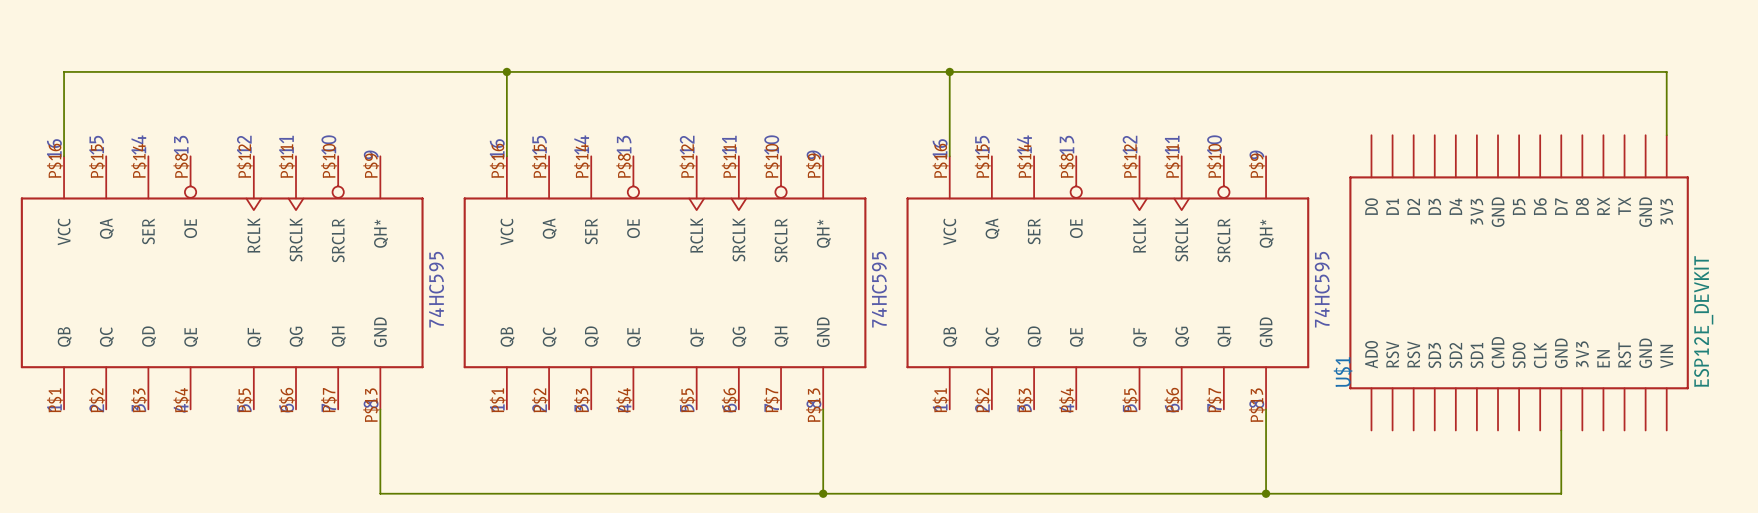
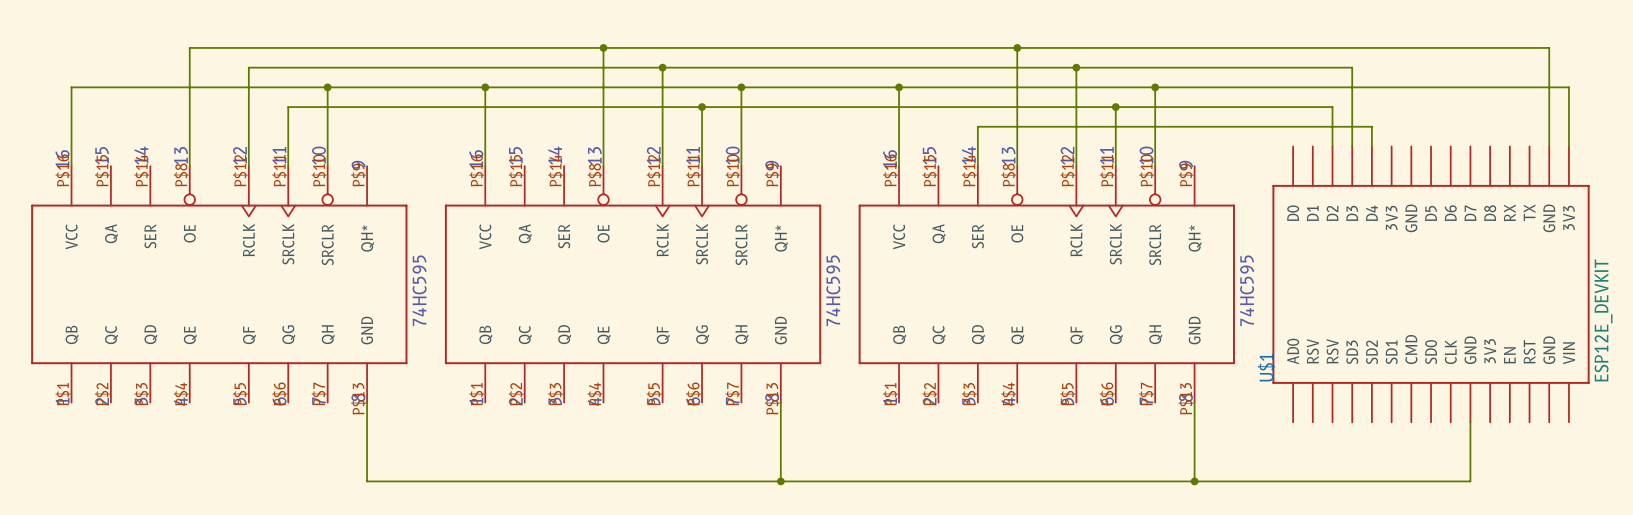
wire: none -> (603, 47) (603, 166)
junction: none -> (603, 47)
wire: none -> (1017, 47) (1017, 166)
junction: none -> (1017, 47)
wire: none -> (662, 67) (662, 166)
junction: none -> (662, 67)
wire: none -> (1076, 67) (1076, 166)
junction: none -> (1076, 67)
wire: none -> (327, 87) (327, 166)
junction: none -> (327, 87)
wire: none -> (741, 87) (741, 166)
junction: none -> (741, 87)
wire: none -> (1155, 87) (1155, 166)
junction: none -> (1155, 87)
wire: none -> (702, 107) (702, 166)
junction: none -> (702, 107)
wire: none -> (1115, 107) (1115, 166)
junction: none -> (1115, 107)
wire: none -> (1332, 146) (1332, 107) (288, 107) (288, 166)
wire: none -> (1352, 146) (1352, 67) (248, 67) (248, 166)
wire: none -> (1371, 146) (1371, 126) (977, 126) (977, 166)
wire: none -> (1549, 146) (1549, 47) (189, 47) (189, 166)

